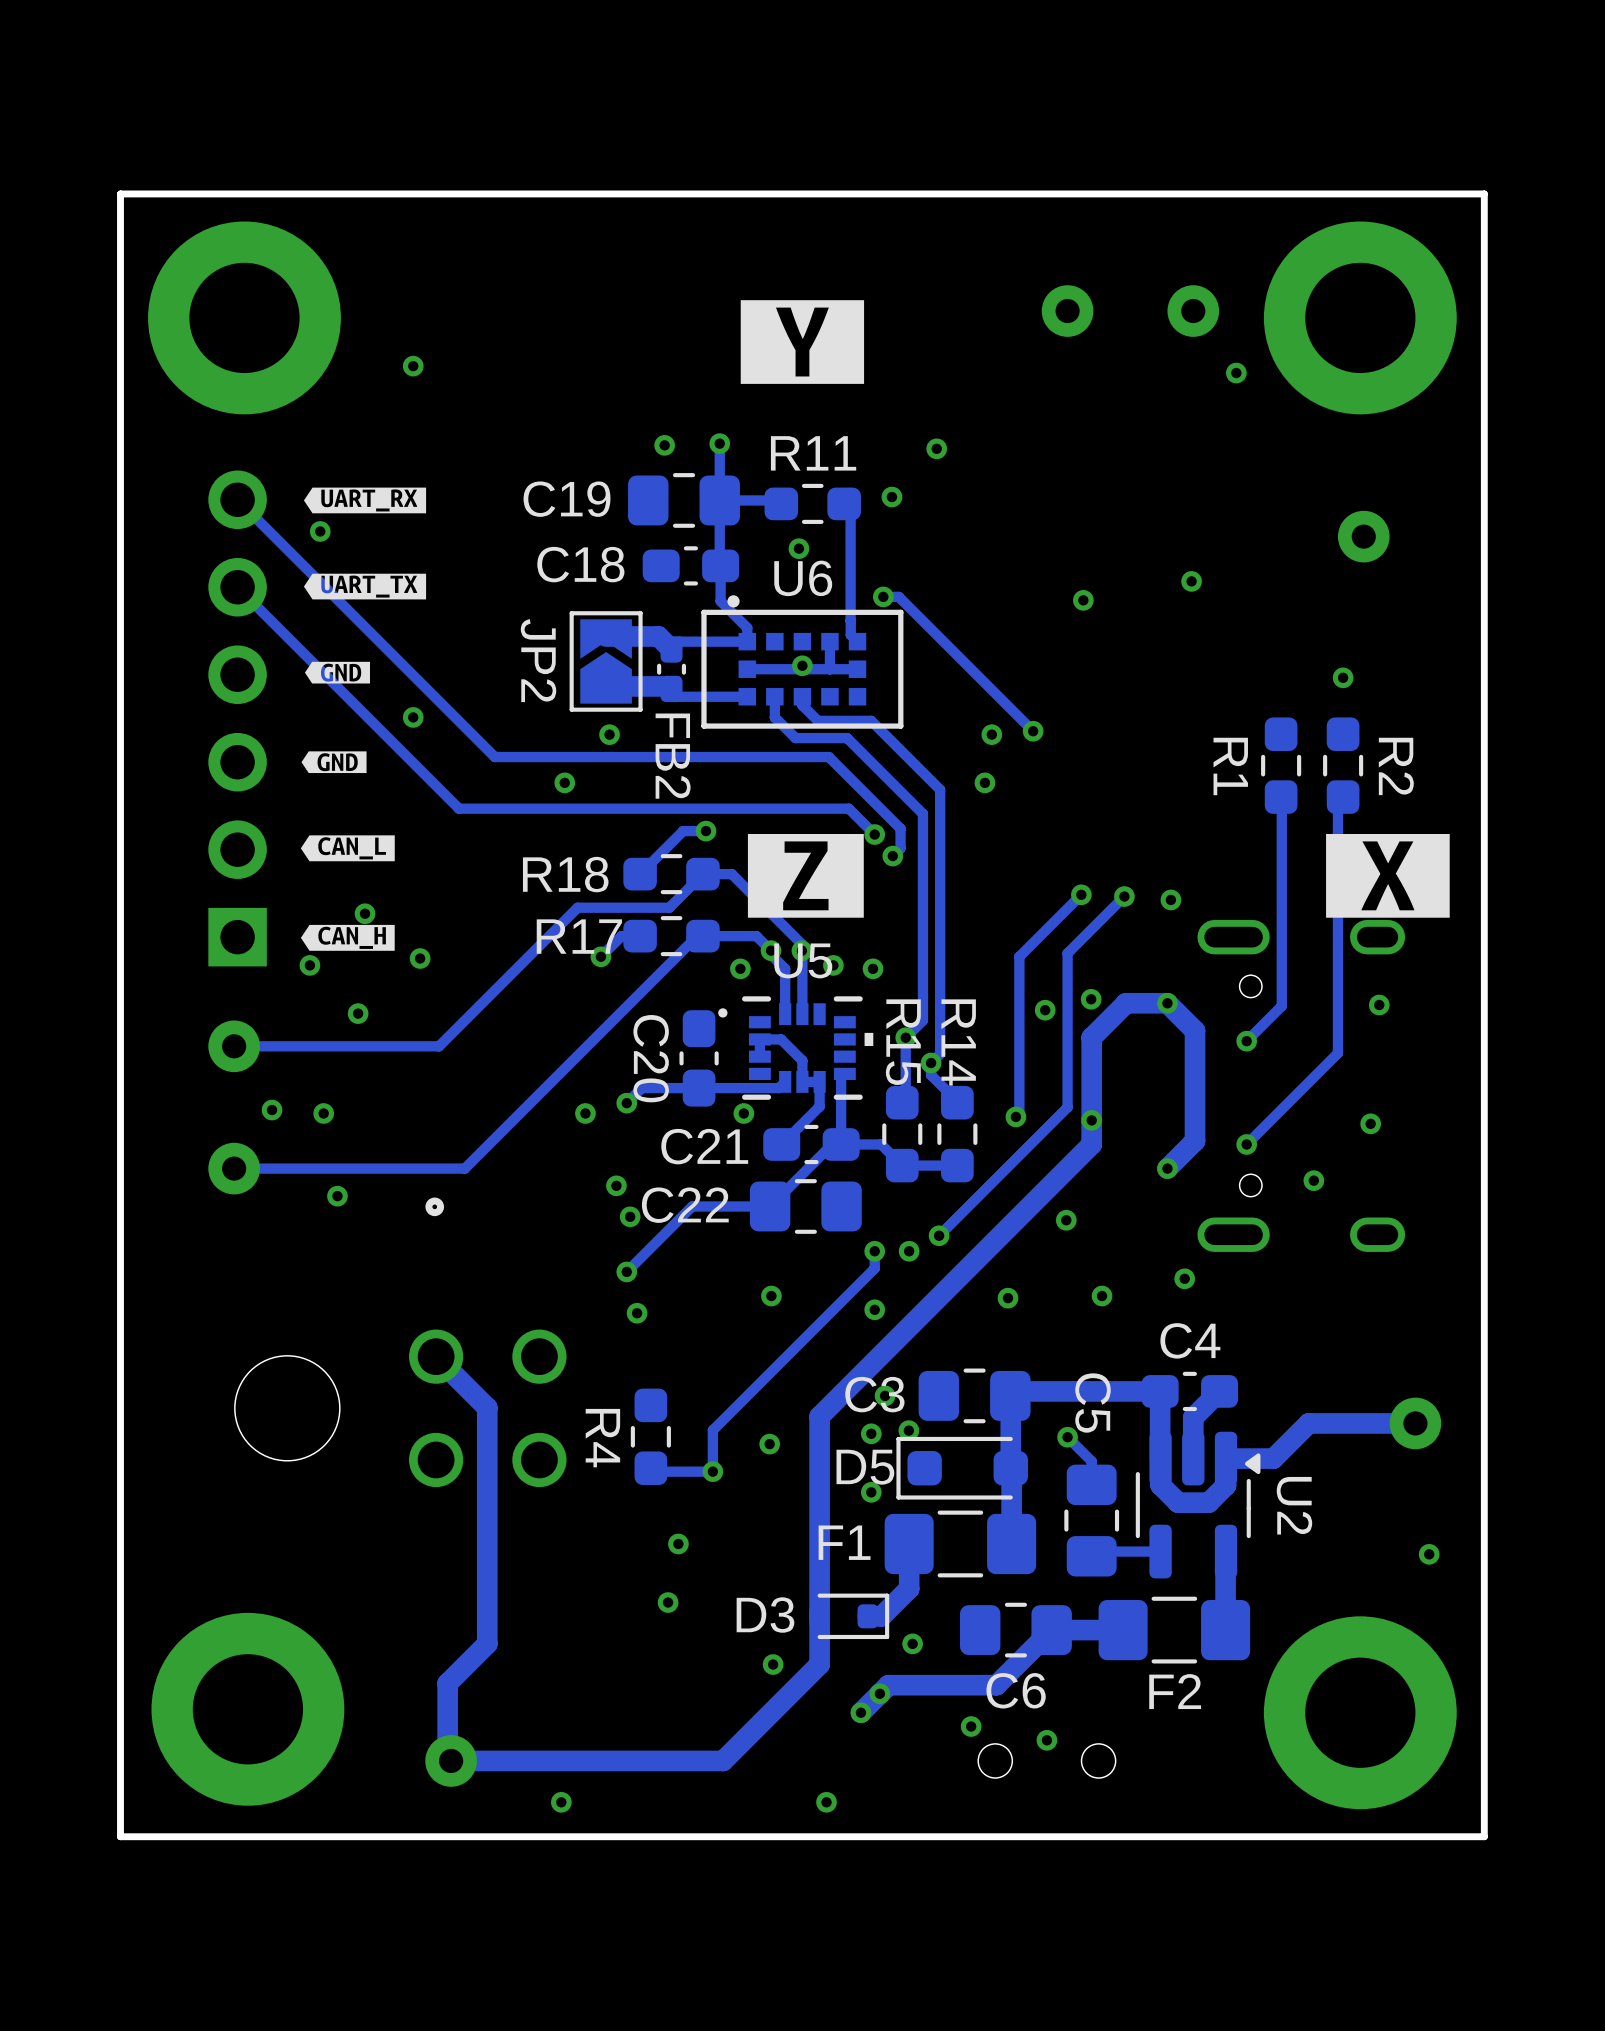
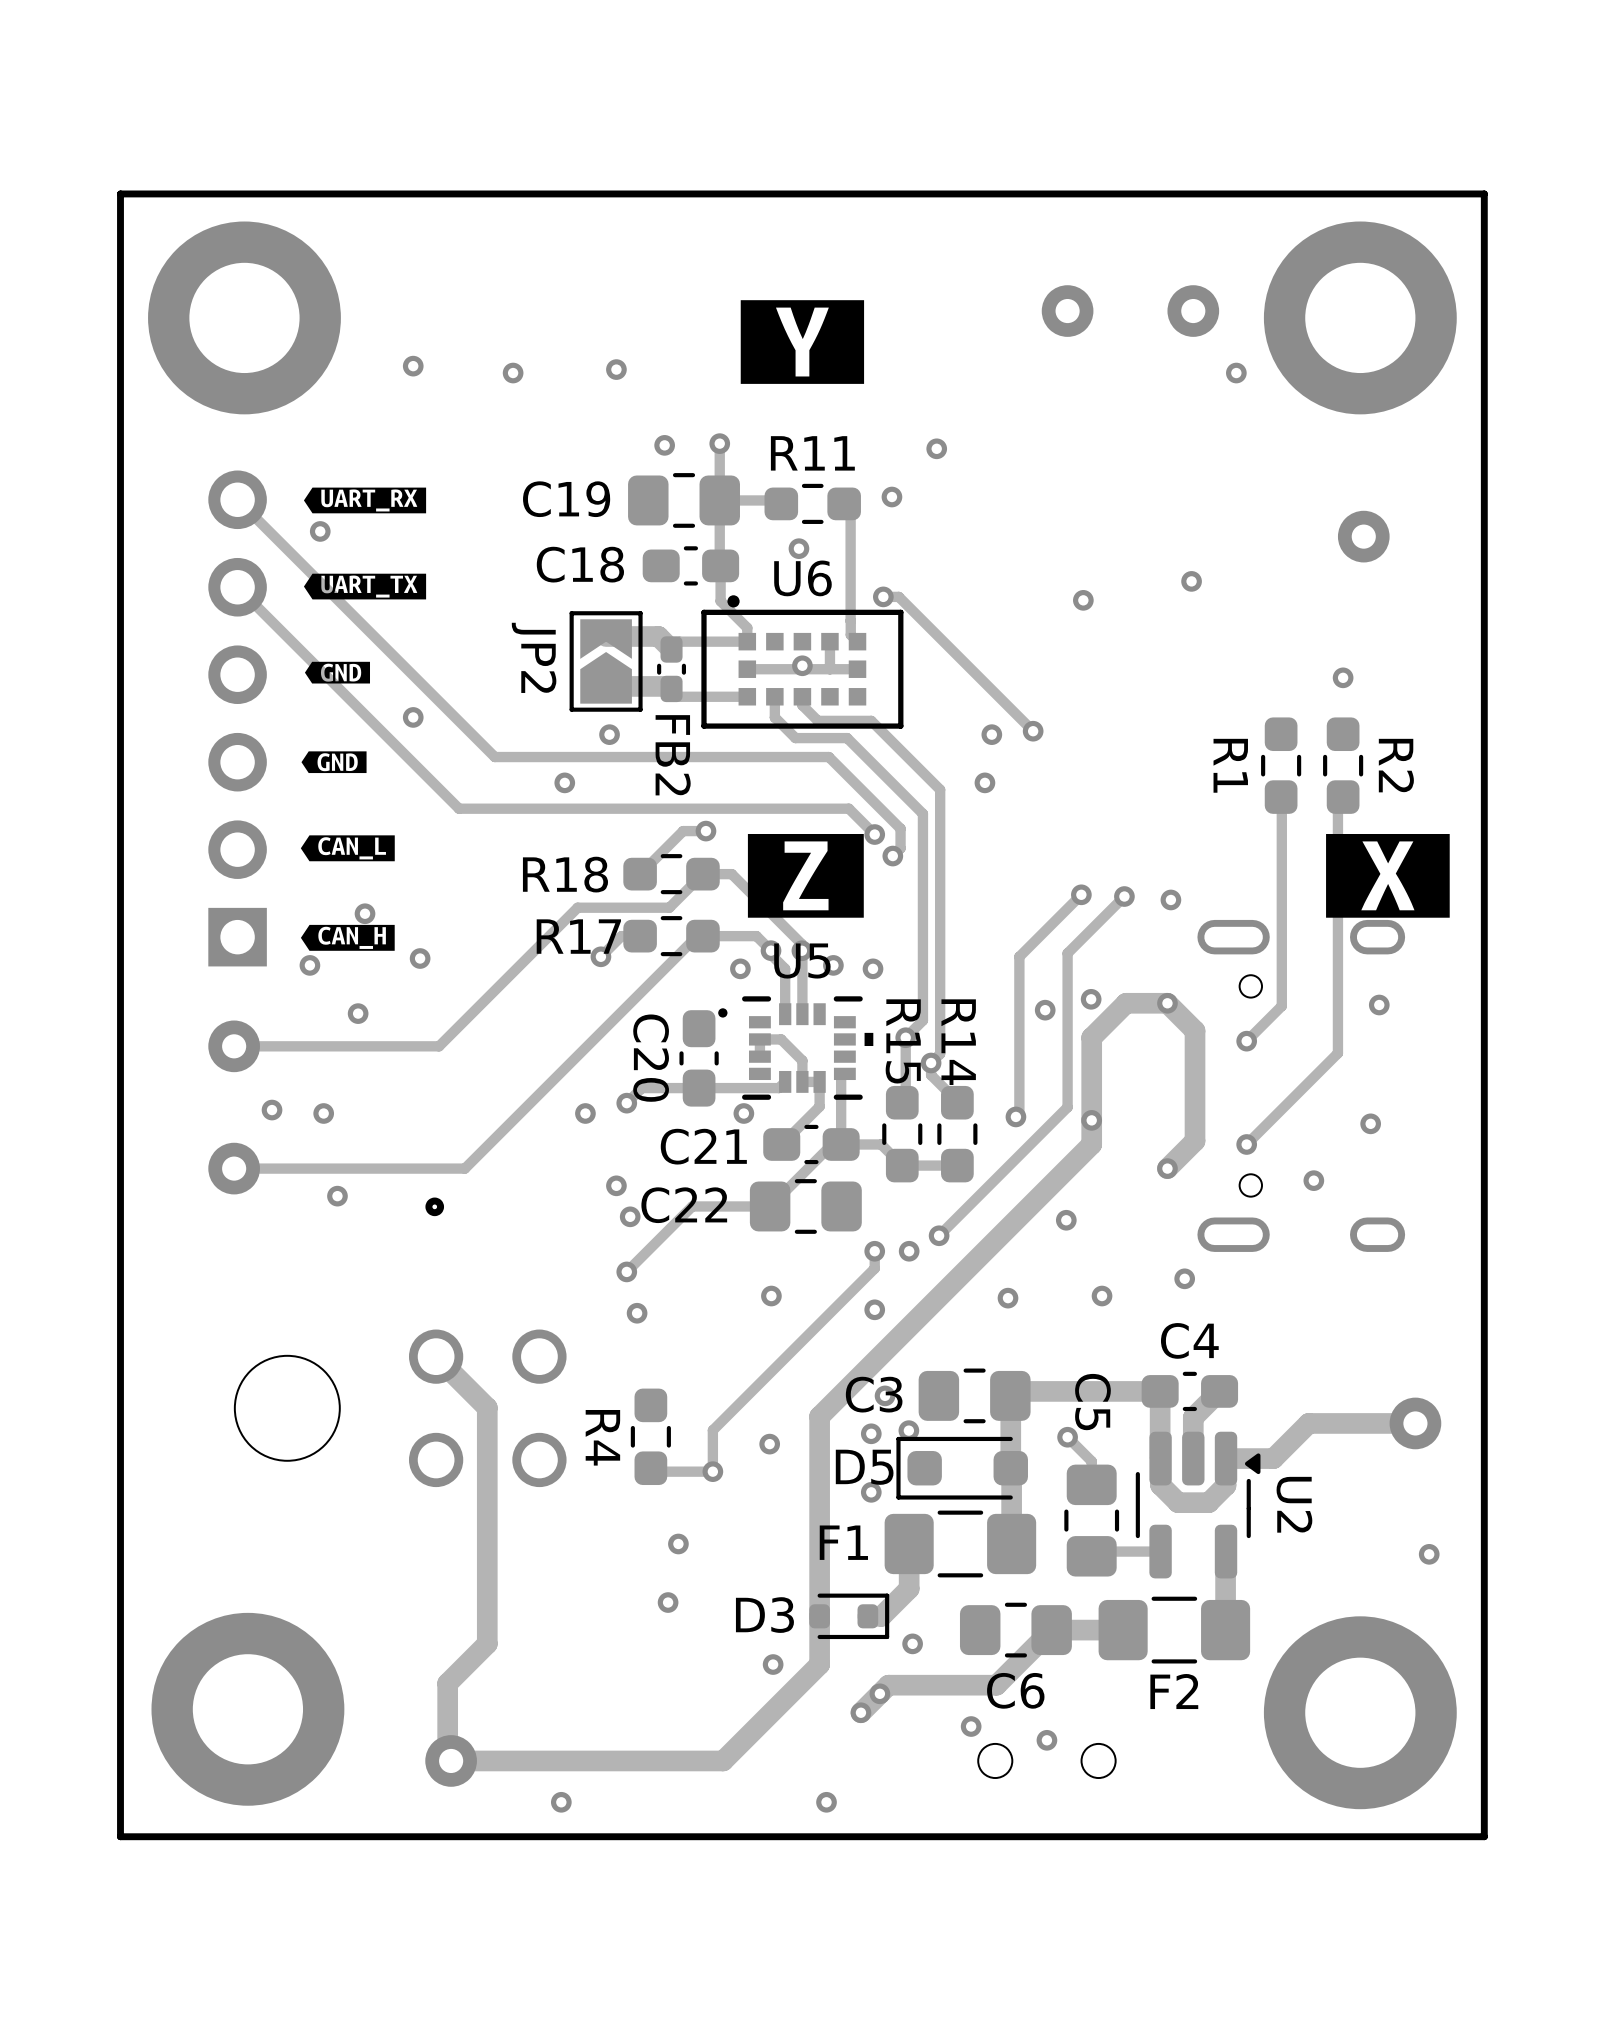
via: none -> (616, 369)
via: none -> (513, 373)

